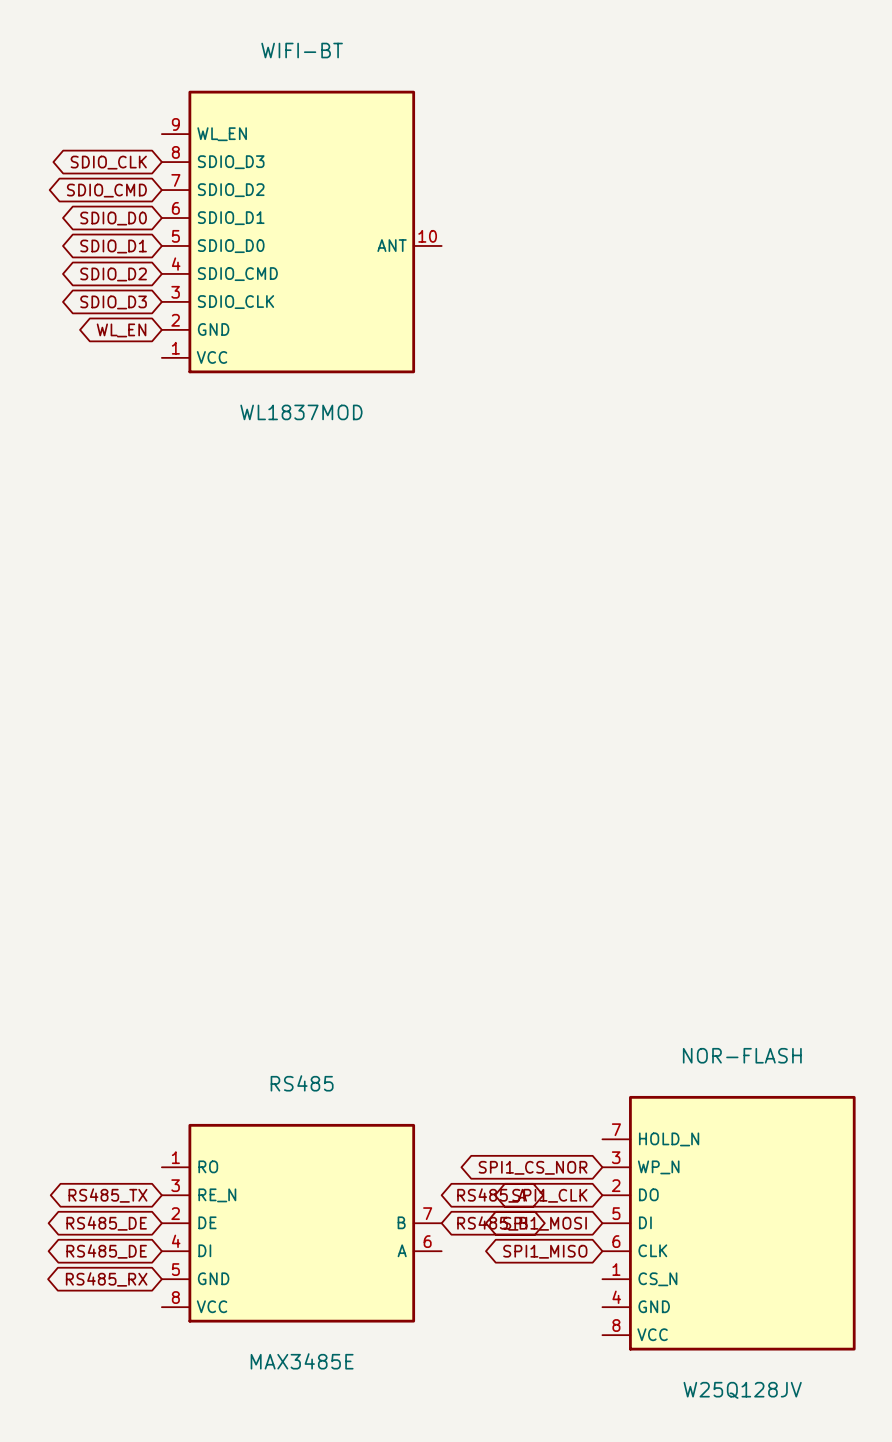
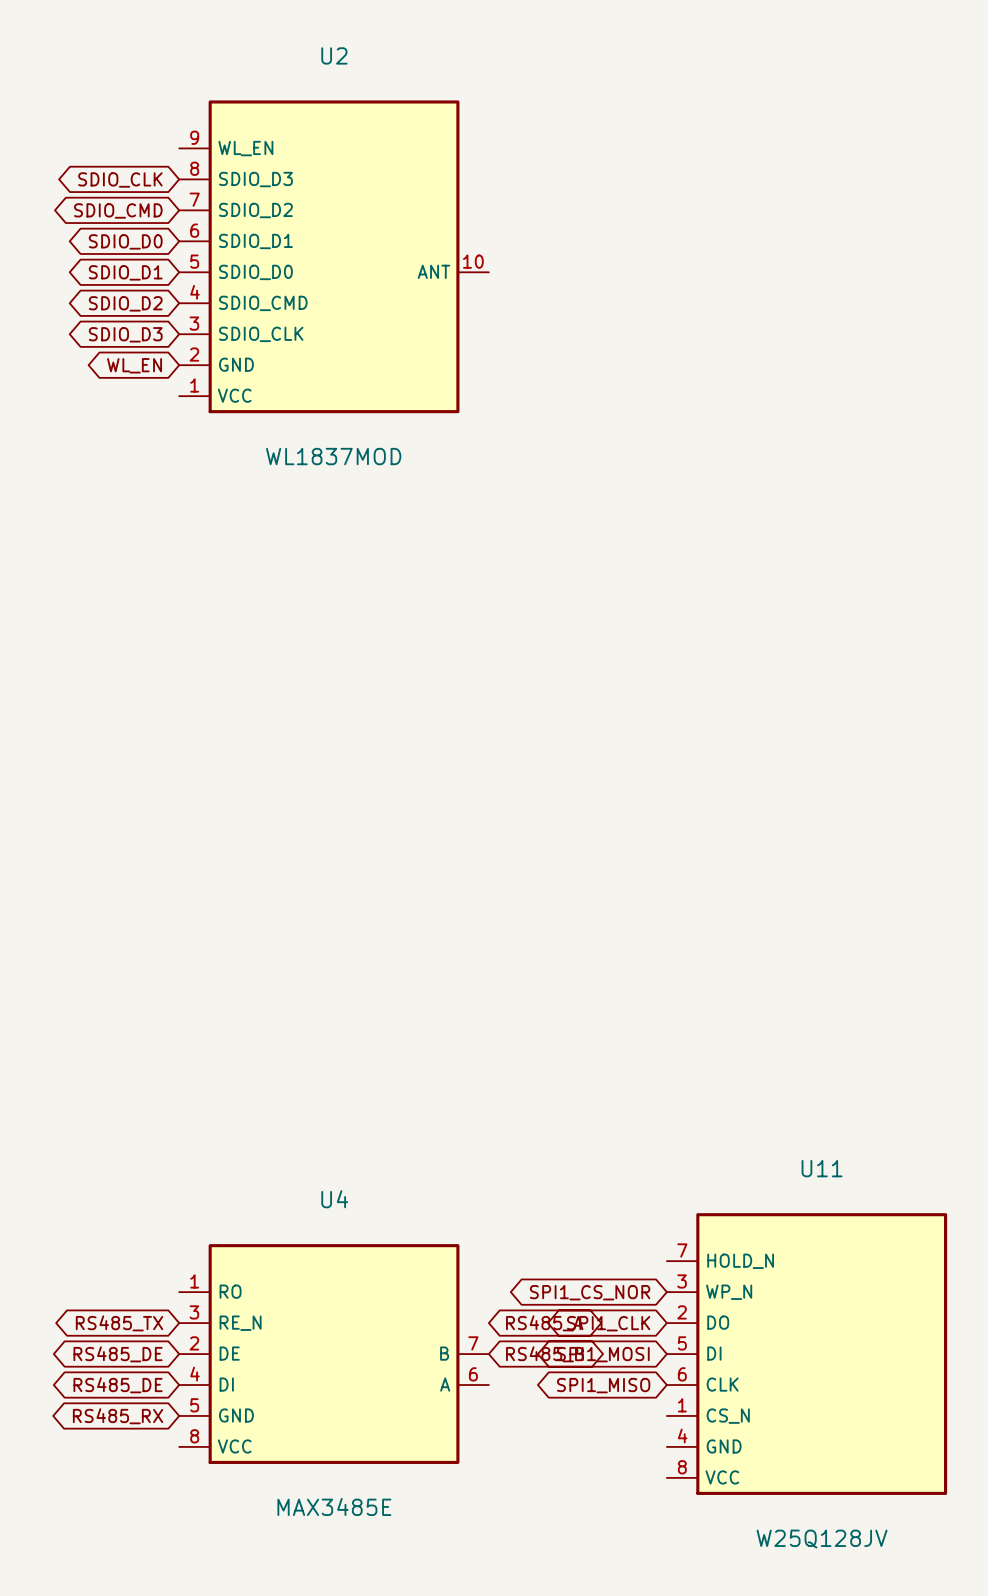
WIFI-BT name: WIFI-BT (302, 50) -> U2 (334, 55)
NOR-FLASH name: NOR-FLASH (742, 1055) -> U11 (822, 1168)
RS485 name: RS485 (302, 1083) -> U4 (334, 1199)

